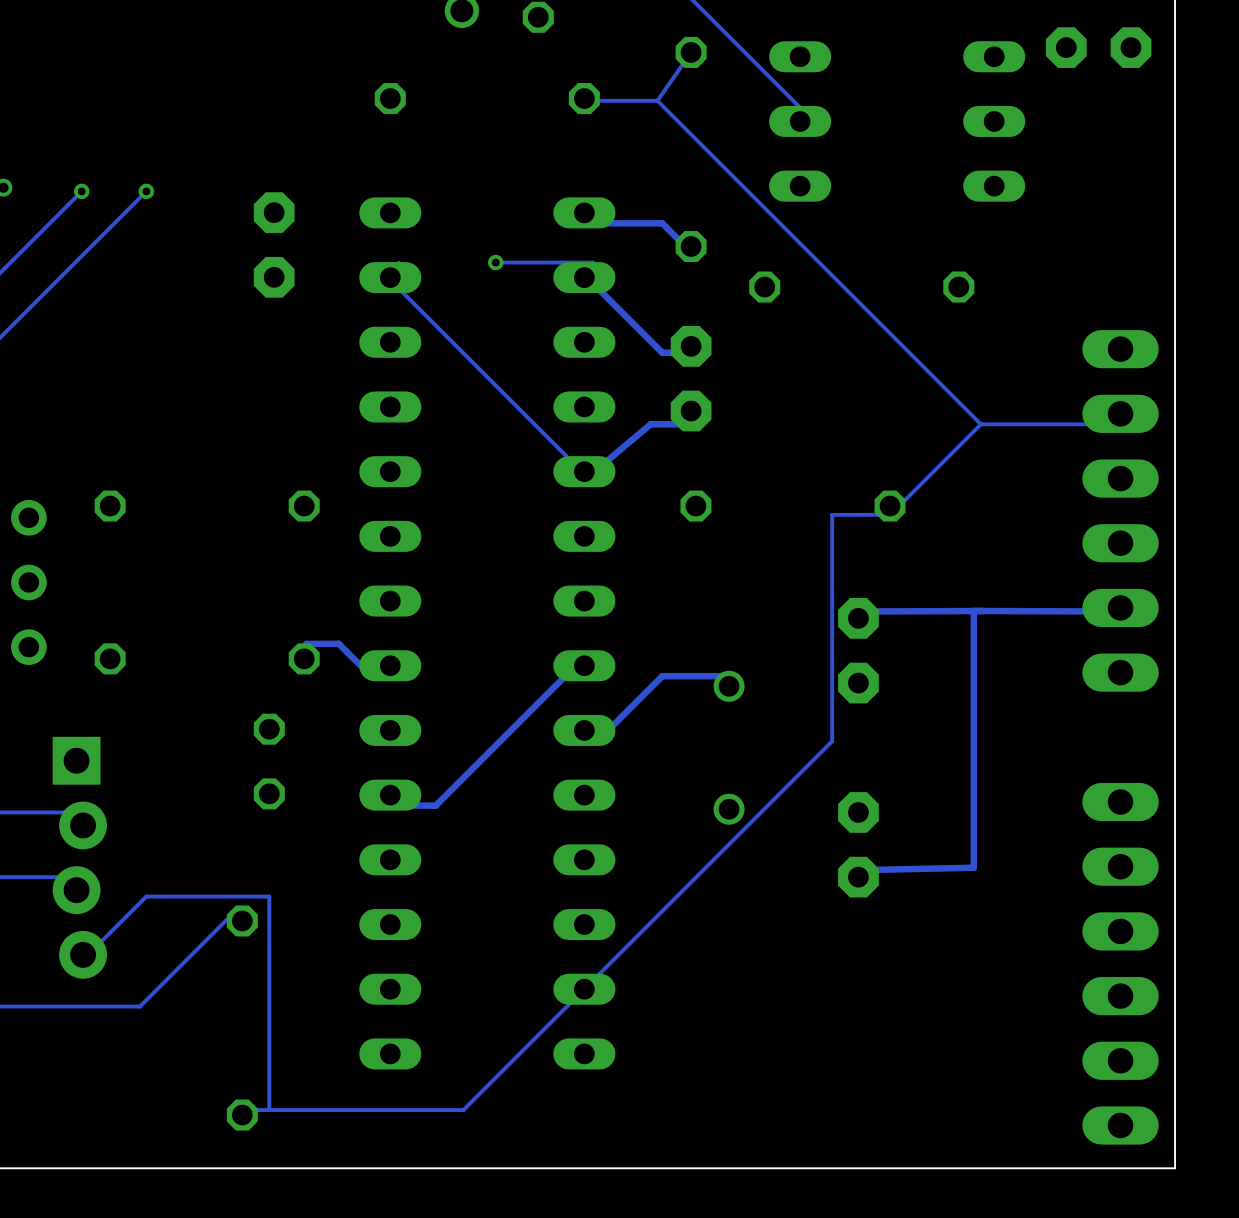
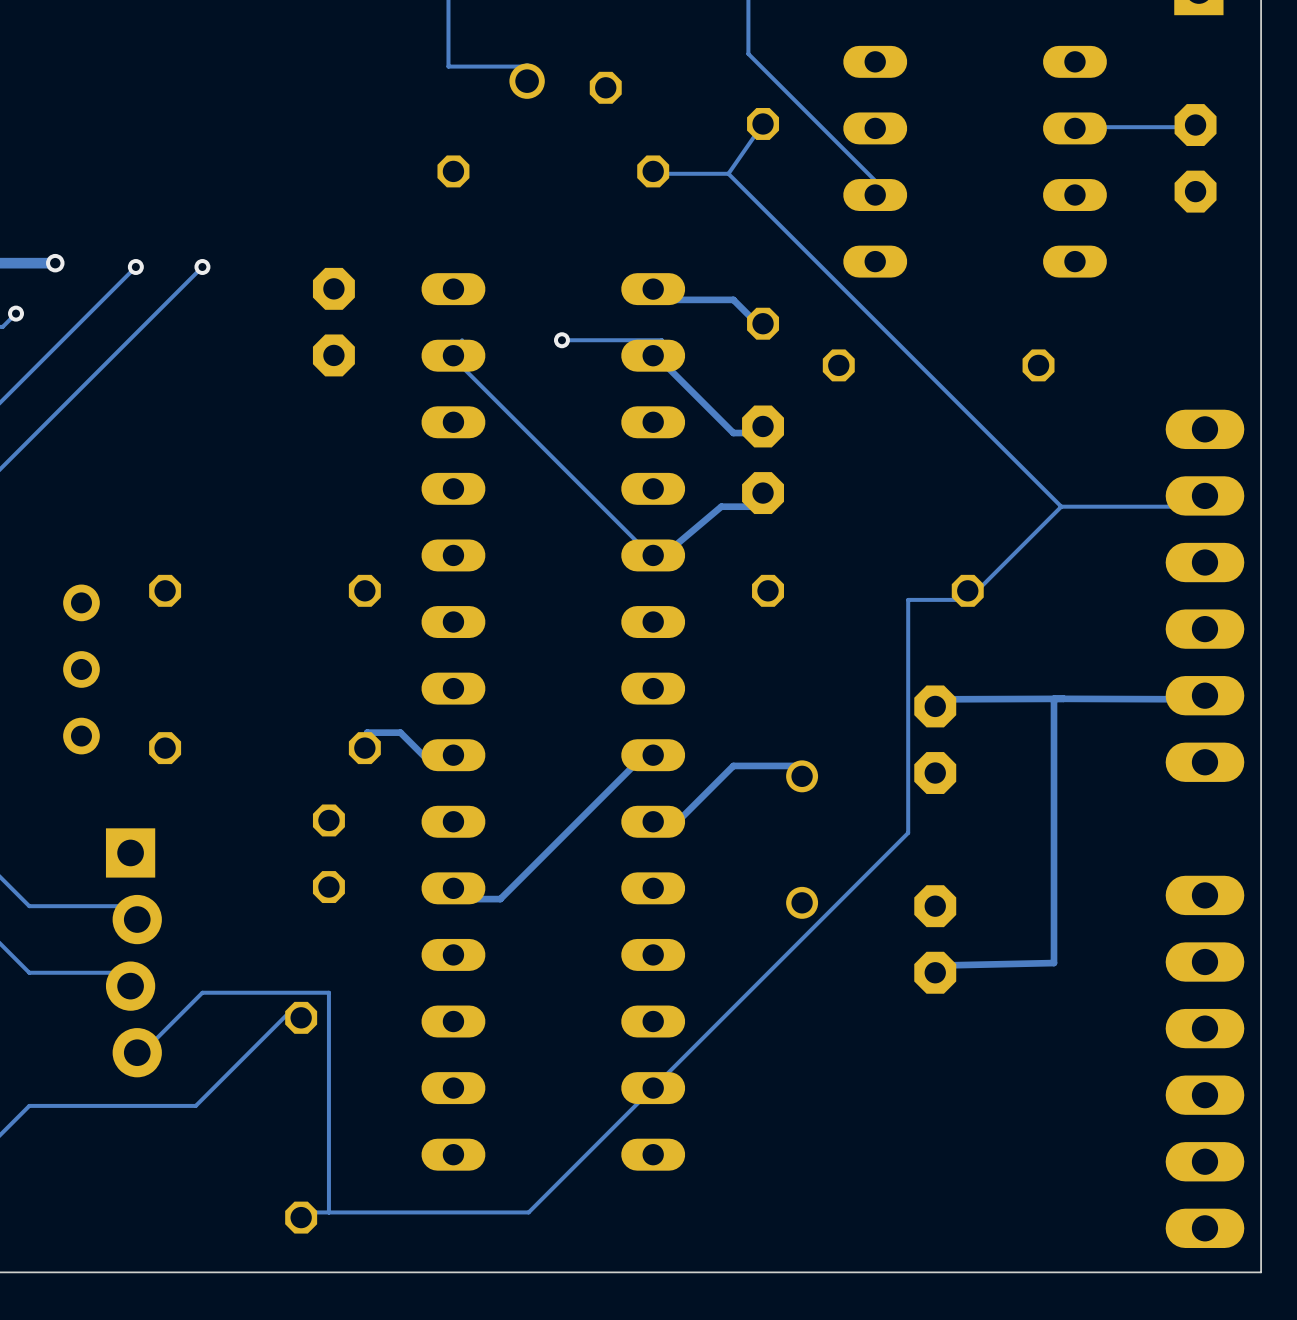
part rotation: 0° (1098, 47) -> 90° clockwise (1195, 158)
track: none -> (1195, 125) (1194, 127) (1074, 128)

